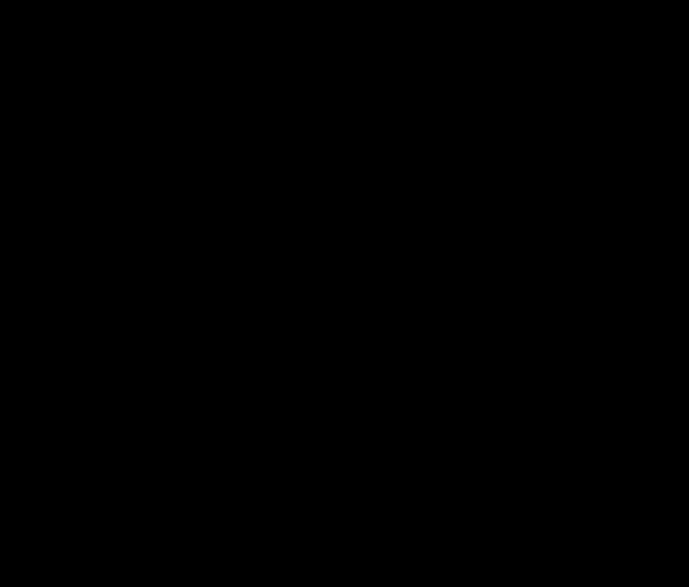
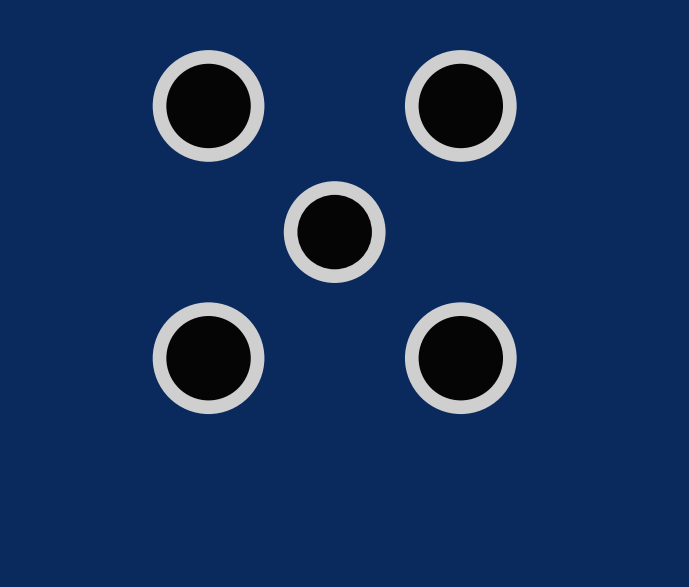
part: none -> (334, 232)

